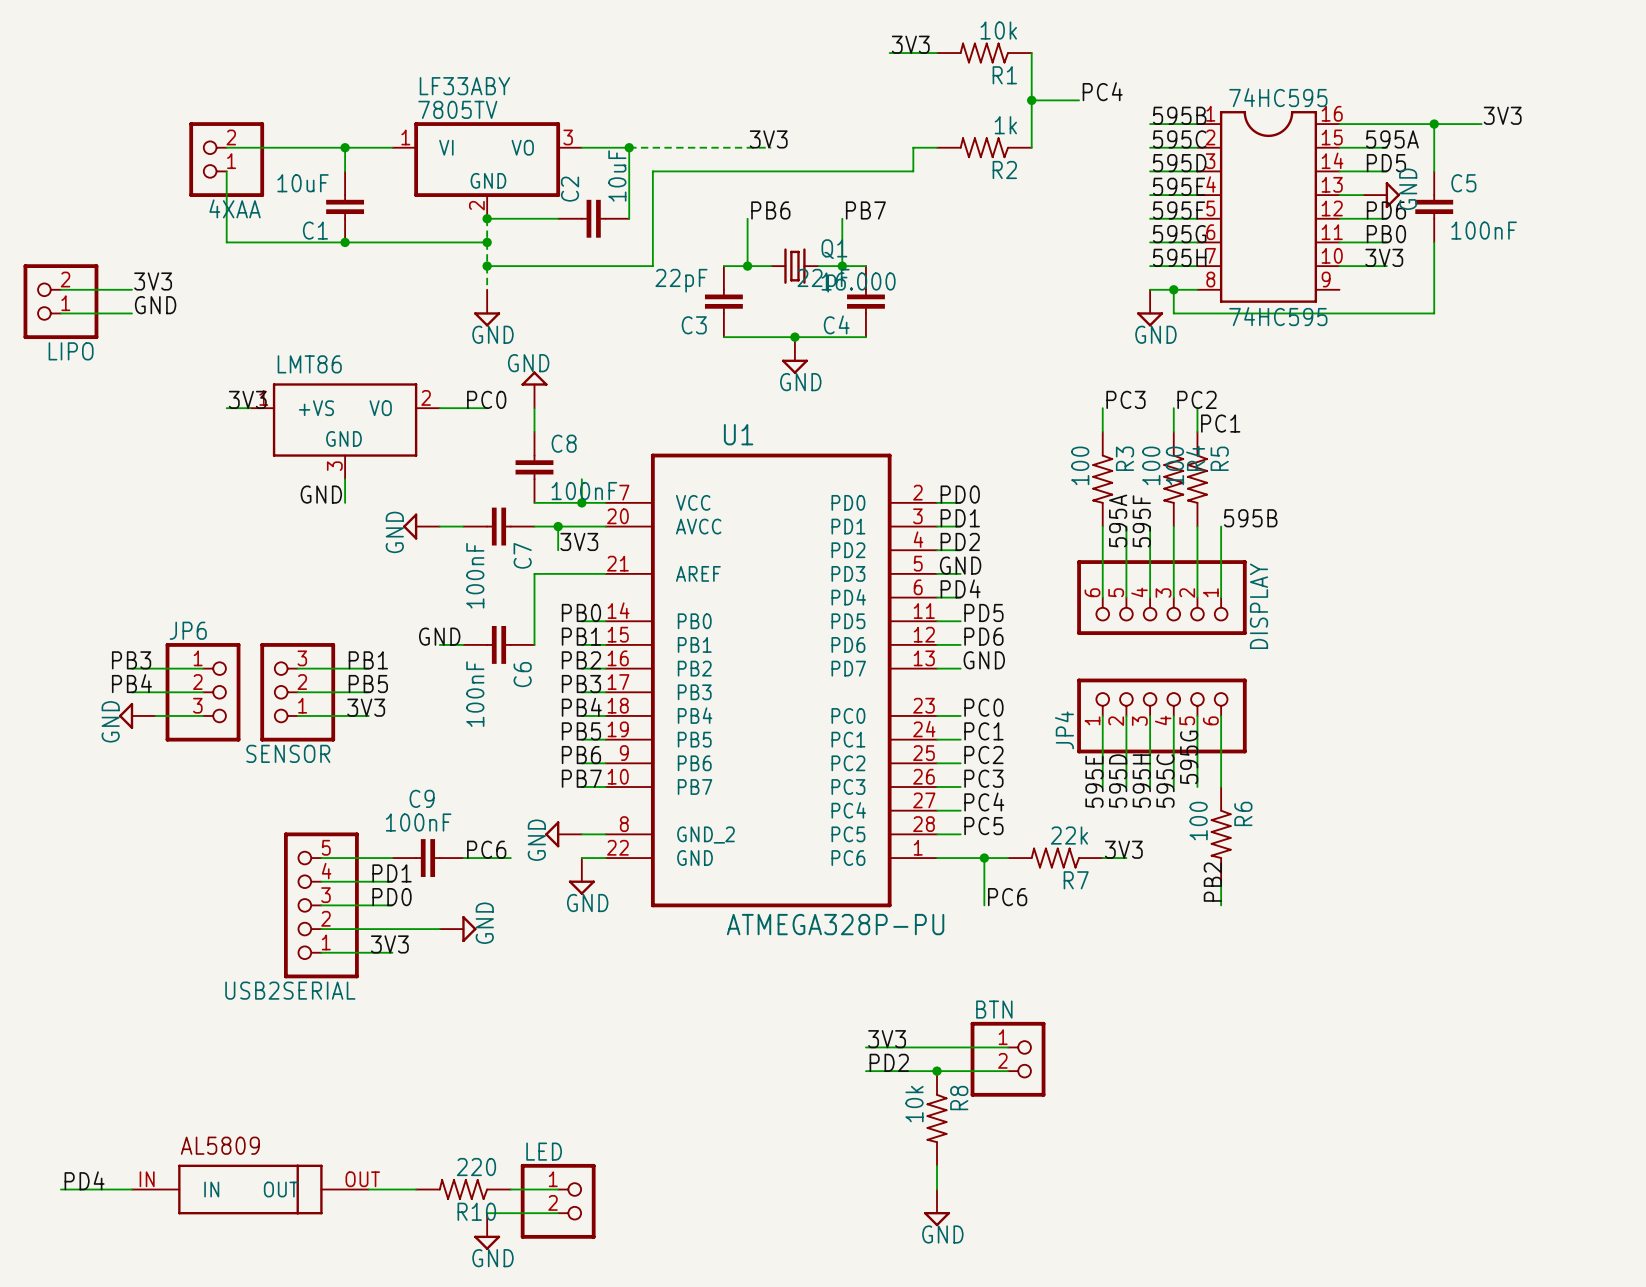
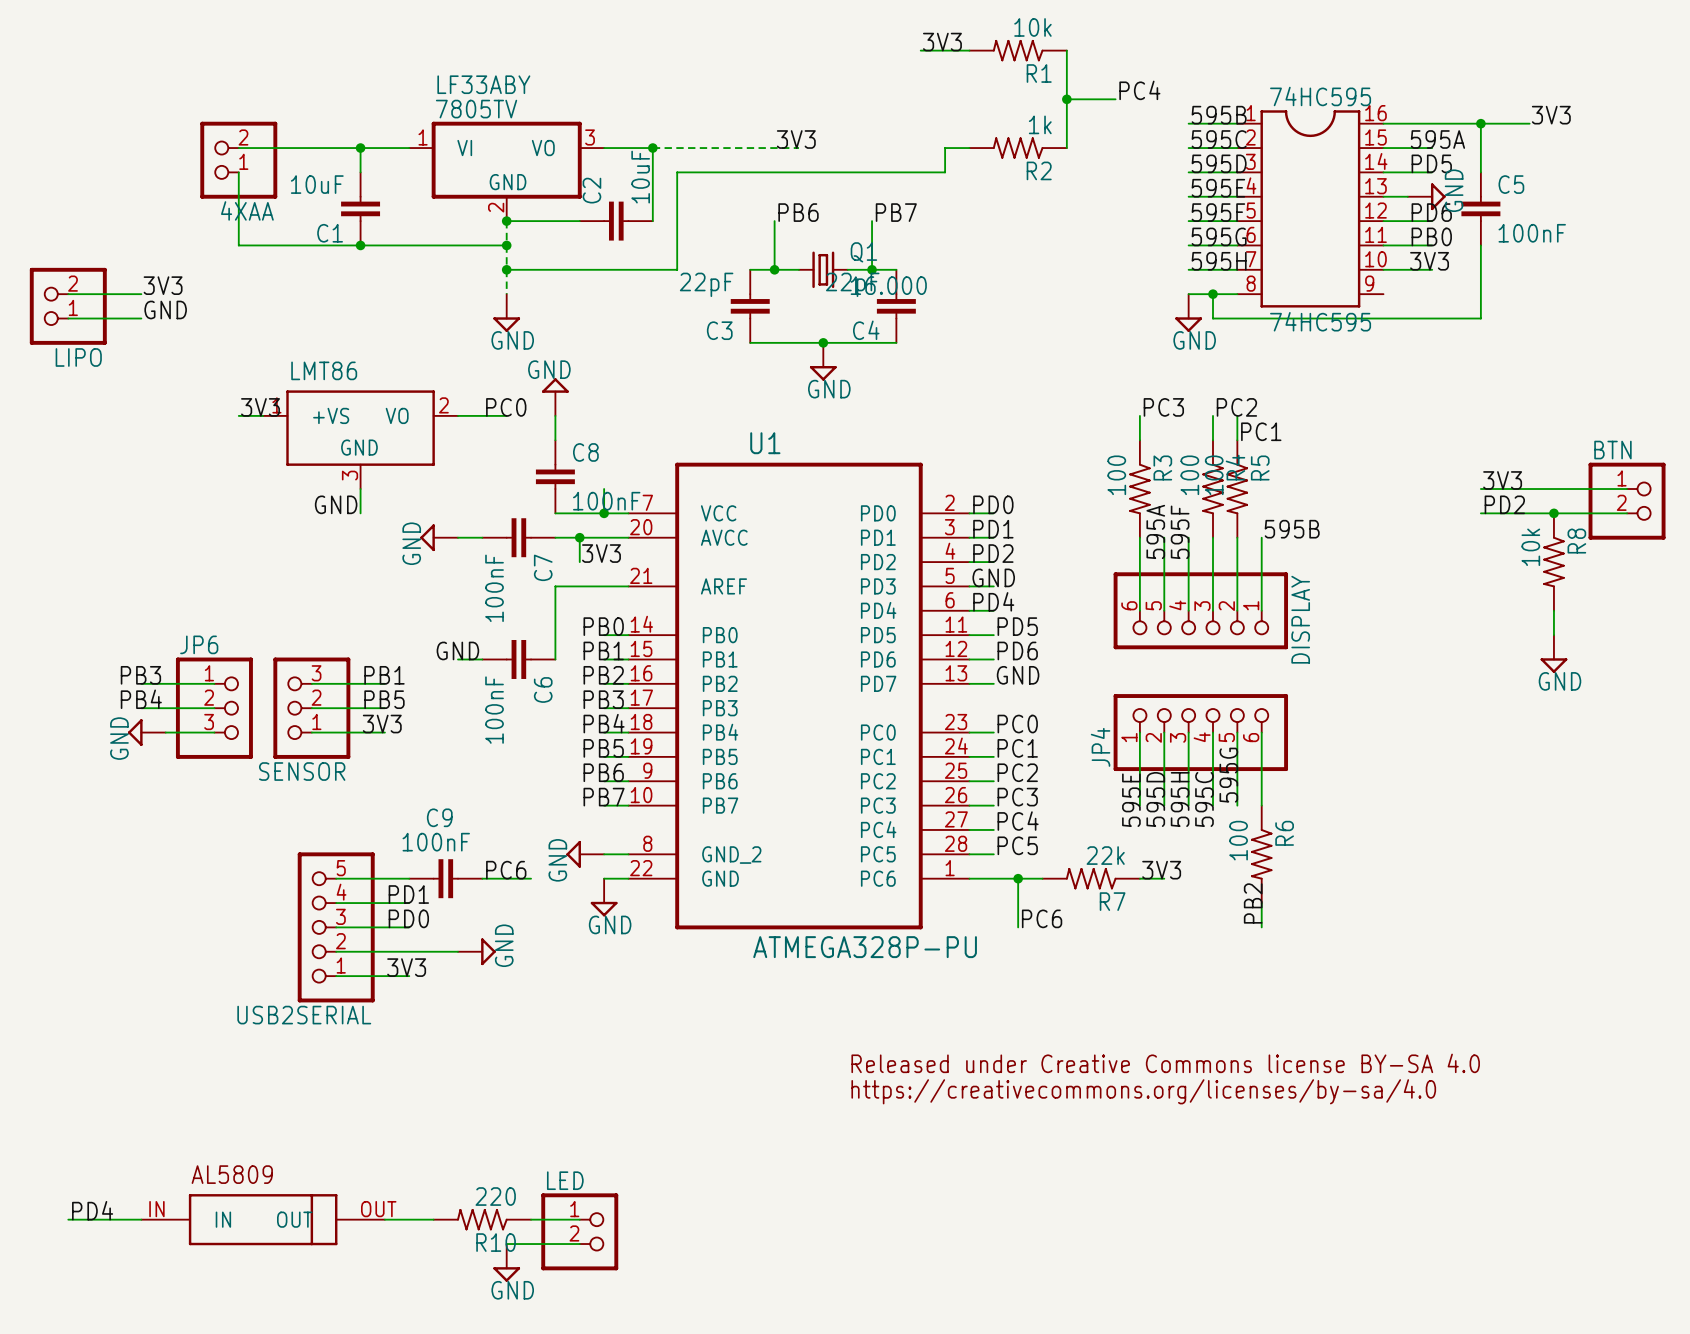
label: none -> 3V3 (1502, 480)
wire: none -> (1480, 489) (1627, 489)
BTN: none -> (1627, 501)
label: none -> PD2 (1504, 504)
wire: none -> (1480, 513) (1627, 513)
junction: none -> (1553, 513)
wire: none -> (1553, 610) (1553, 635)
power symbol: none -> GND (1553, 654)
text: none -> Released under Creative Commons license BY-SA 4.0 (1165, 1063)
label: 3V3 (887, 1039) -> none
wire: (865, 1047) (1008, 1047) -> none
BTN: (1008, 1059) -> none
label: PD2 (889, 1062) -> none
text: none -> https://creativecommons.org/licenses/by-sa/4.0 (1143, 1091)
wire: (865, 1071) (1008, 1071) -> none
junction: (937, 1071) -> none
R8 position: (937, 1118) -> (1553, 562)
wire: (937, 1165) (937, 1189) -> none
power symbol: GND (937, 1207) -> none

